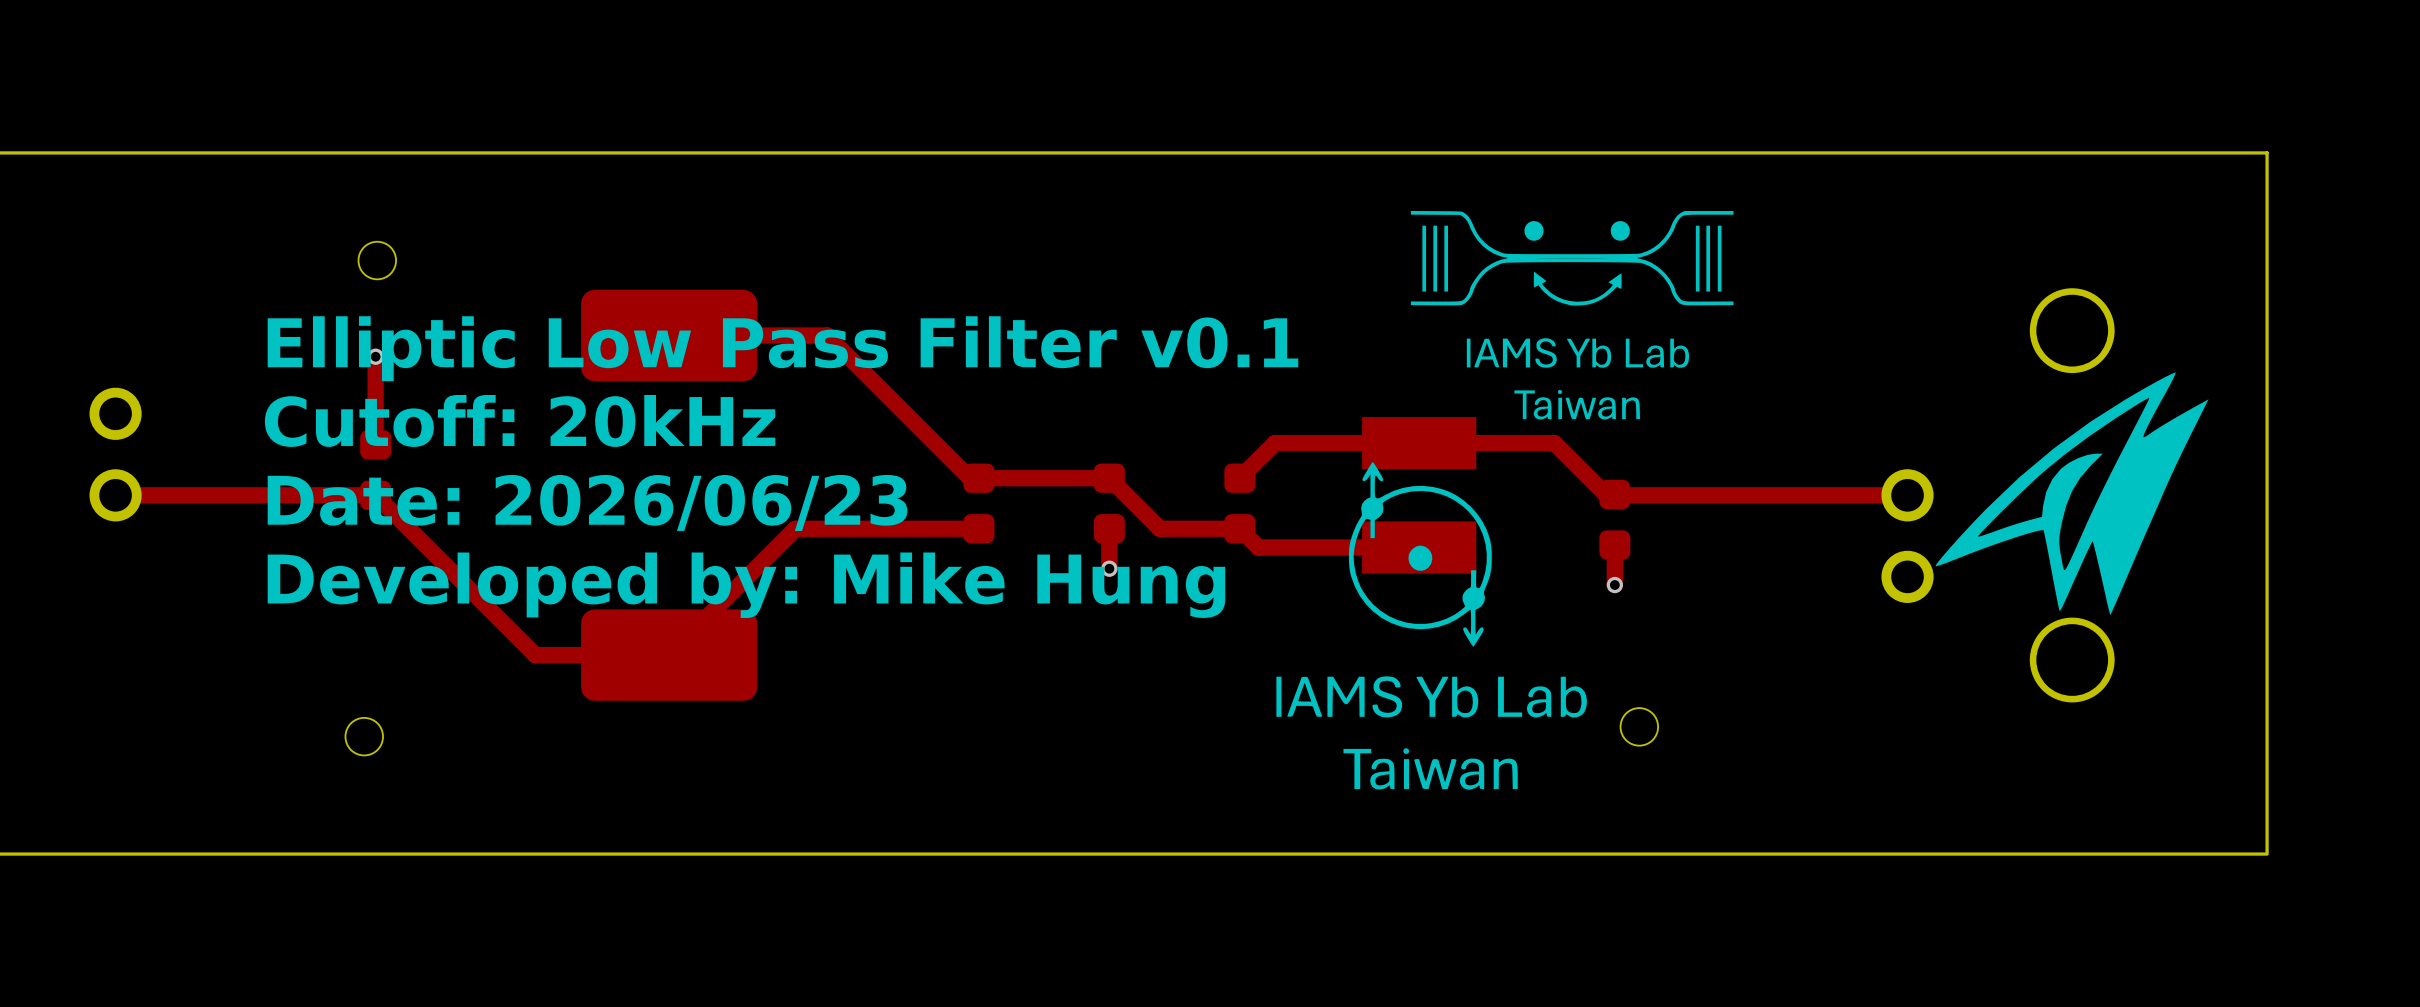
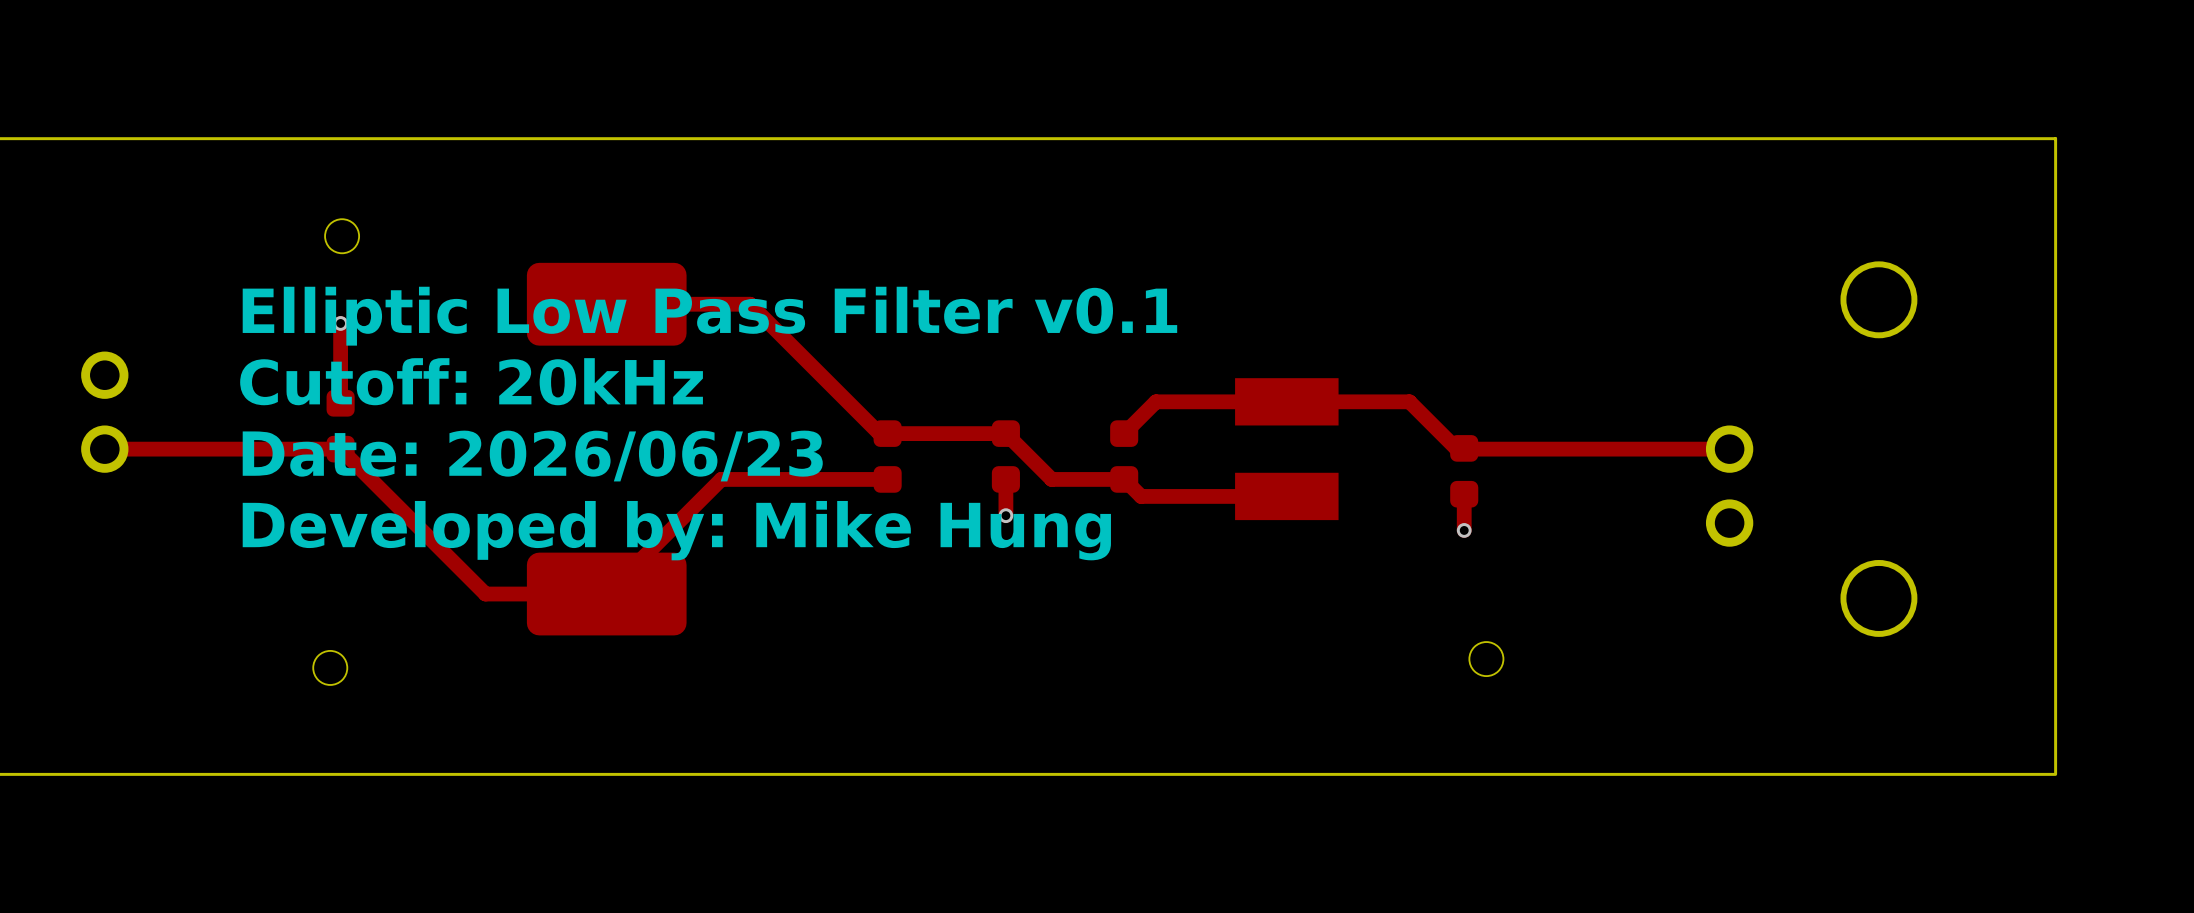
drawing: [1410, 210, 1734, 420] -> none
drawing: [1935, 372, 2209, 615] -> none
drawing: [1276, 462, 1587, 790] -> none

